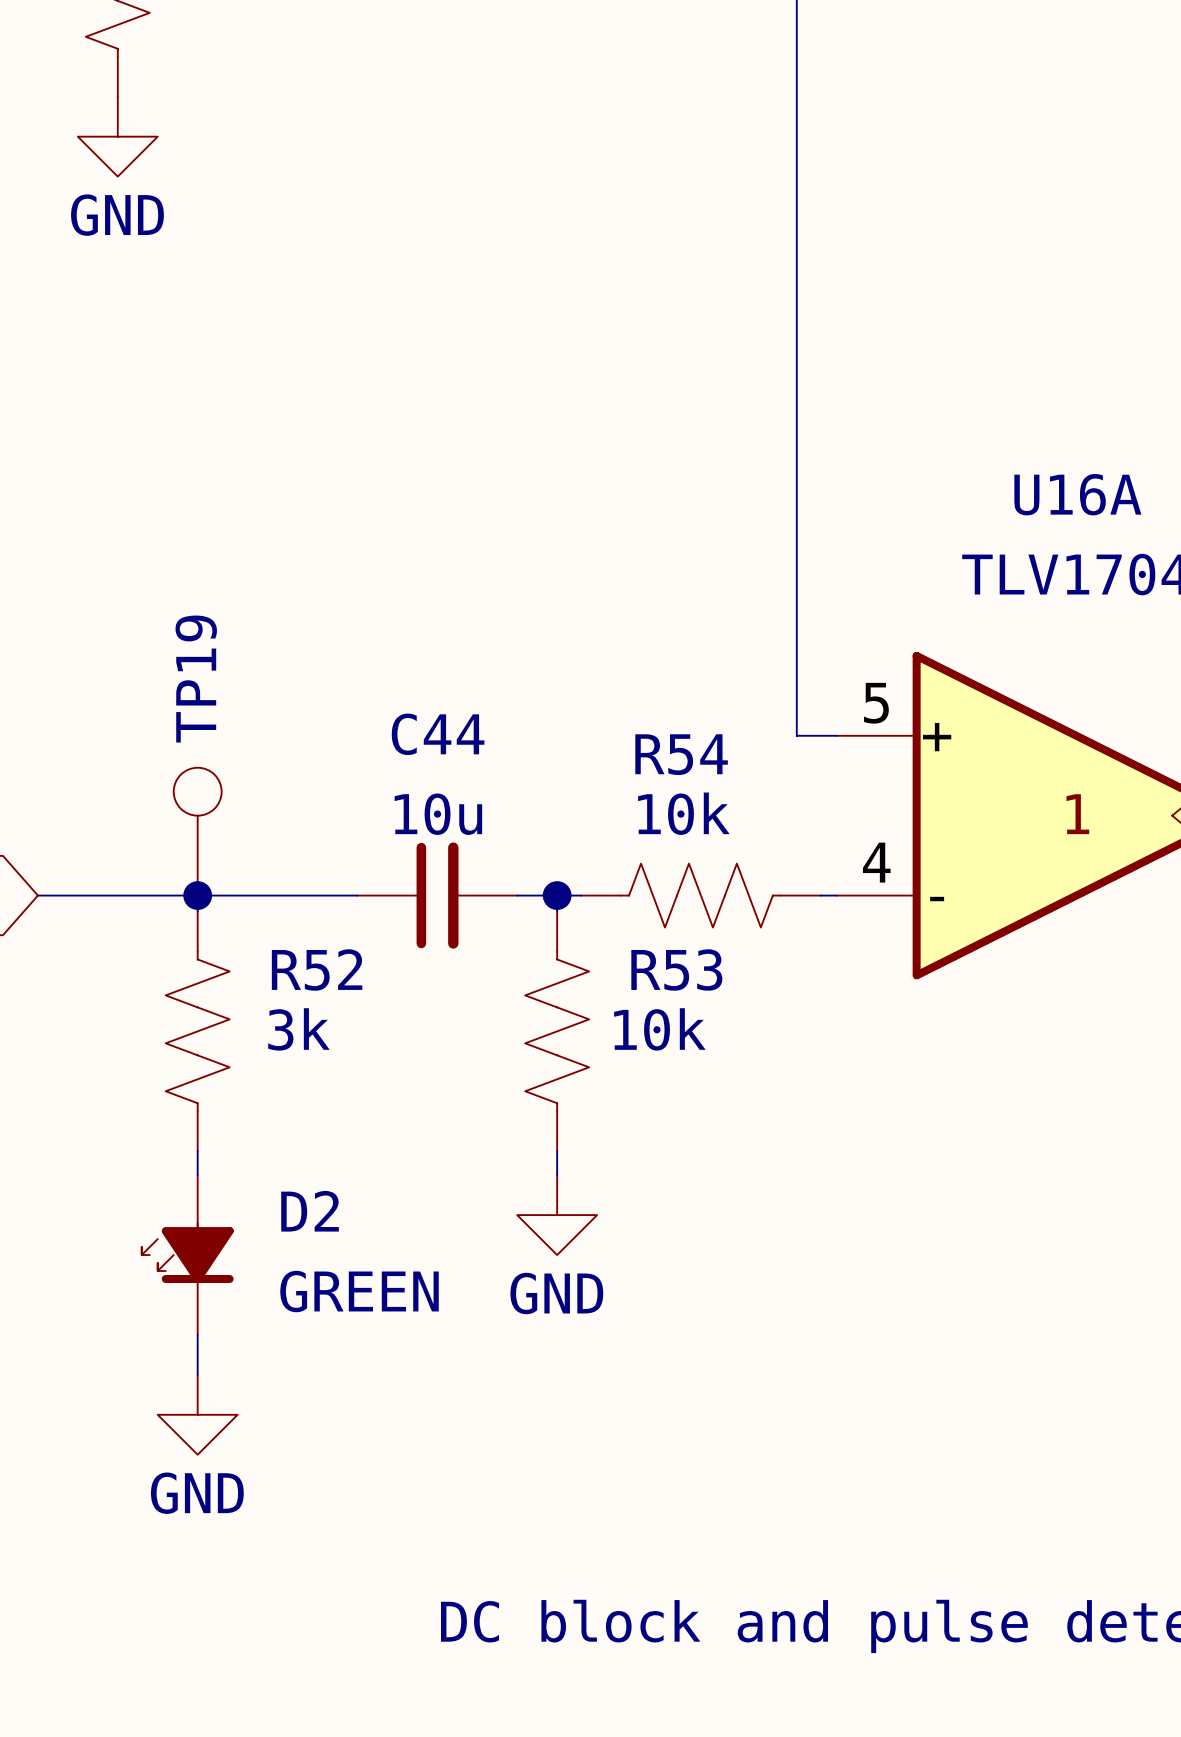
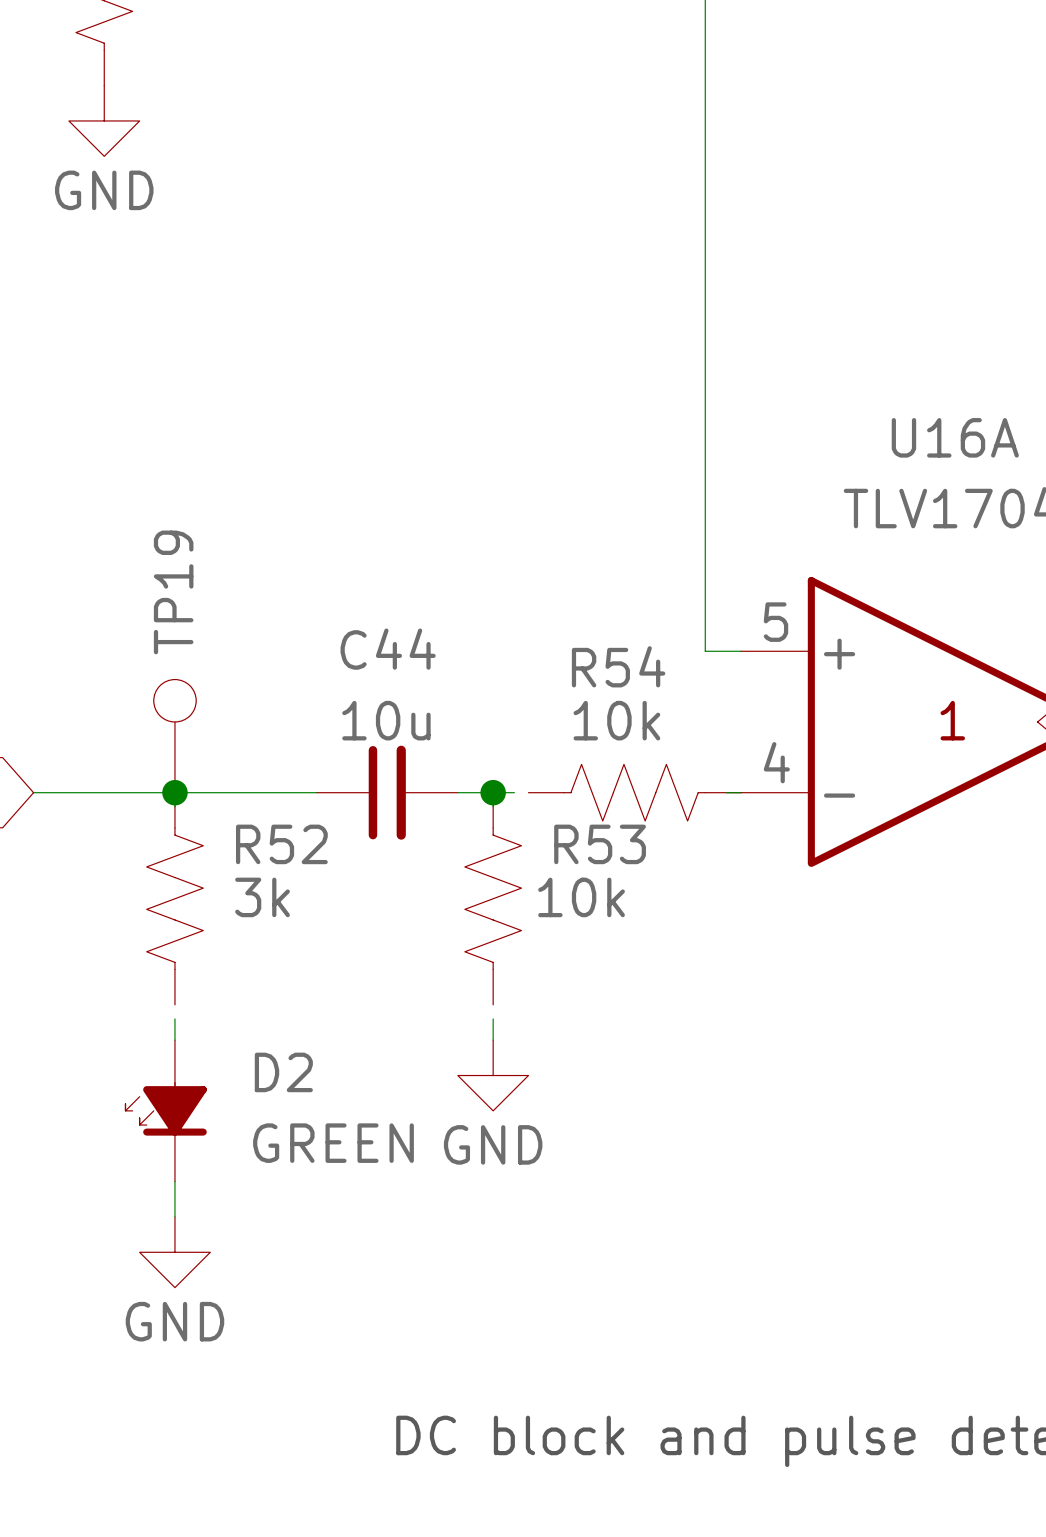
R54 position: (700, 895) -> (634, 792)
R52 position: (197, 1031) -> (174, 898)
R53 position: (557, 1031) -> (493, 898)

